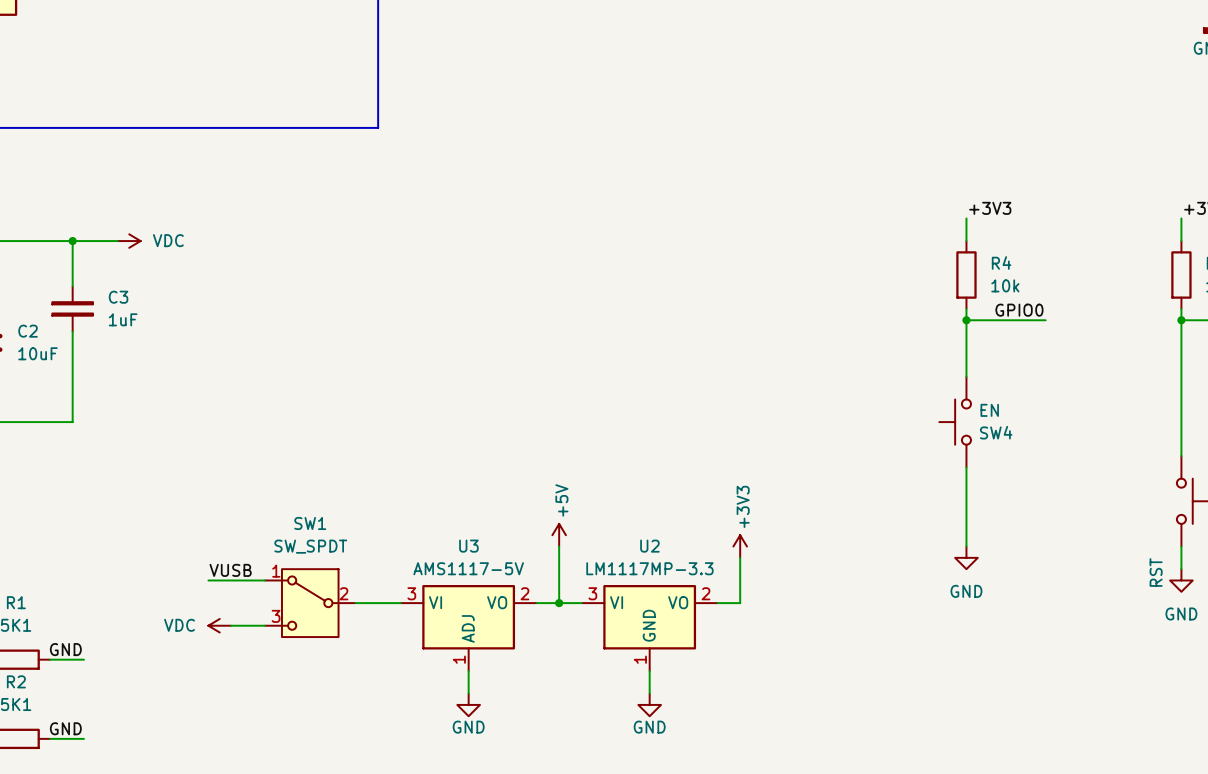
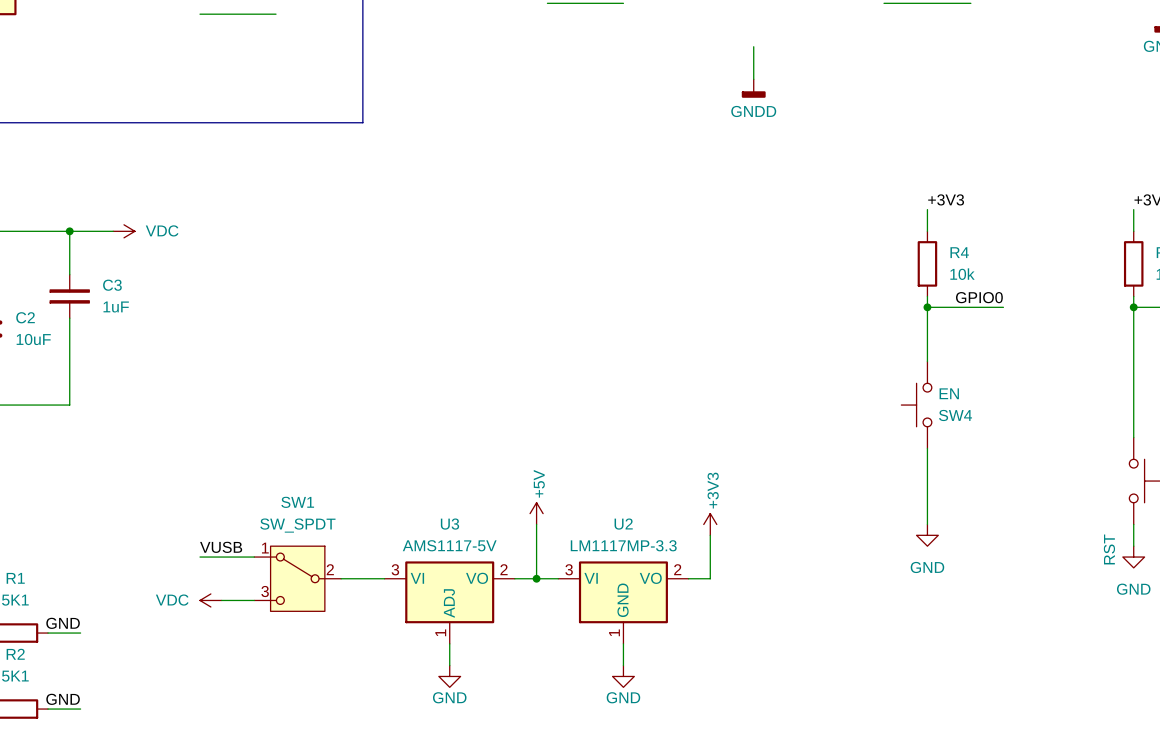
wire: none -> (547, 3) (623, 3)
wire: none -> (884, 3) (970, 3)
wire: none -> (200, 14) (276, 14)
wire: none -> (753, 46) (753, 79)
power symbol: none -> GNDD (753, 88)

